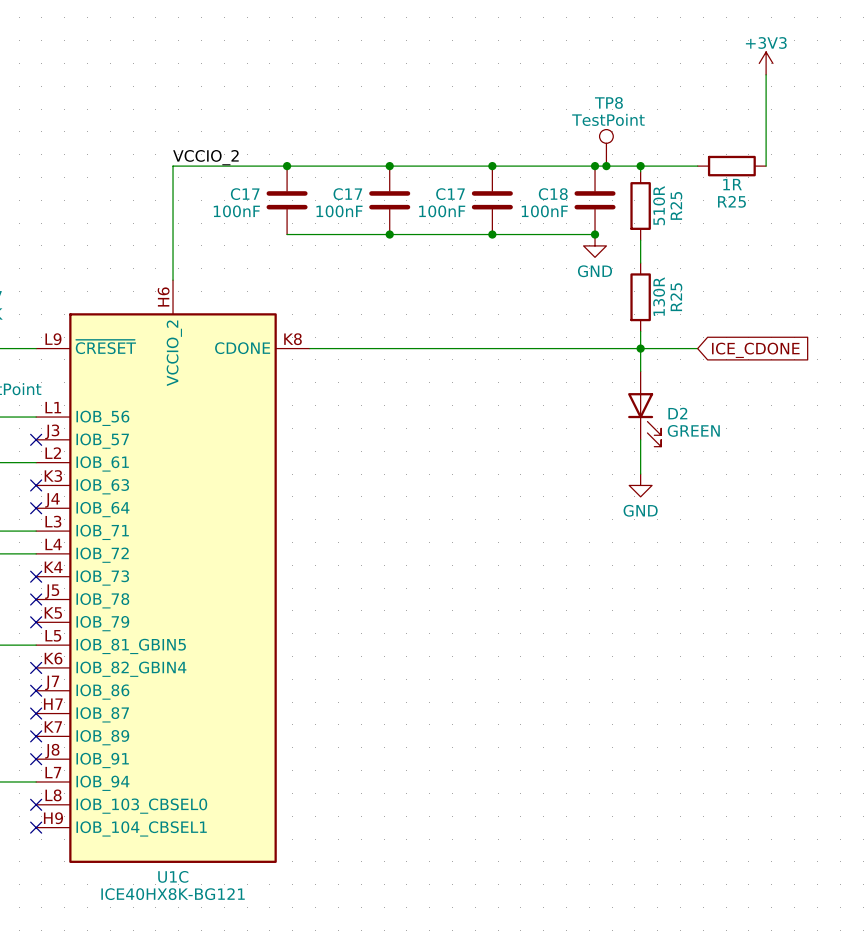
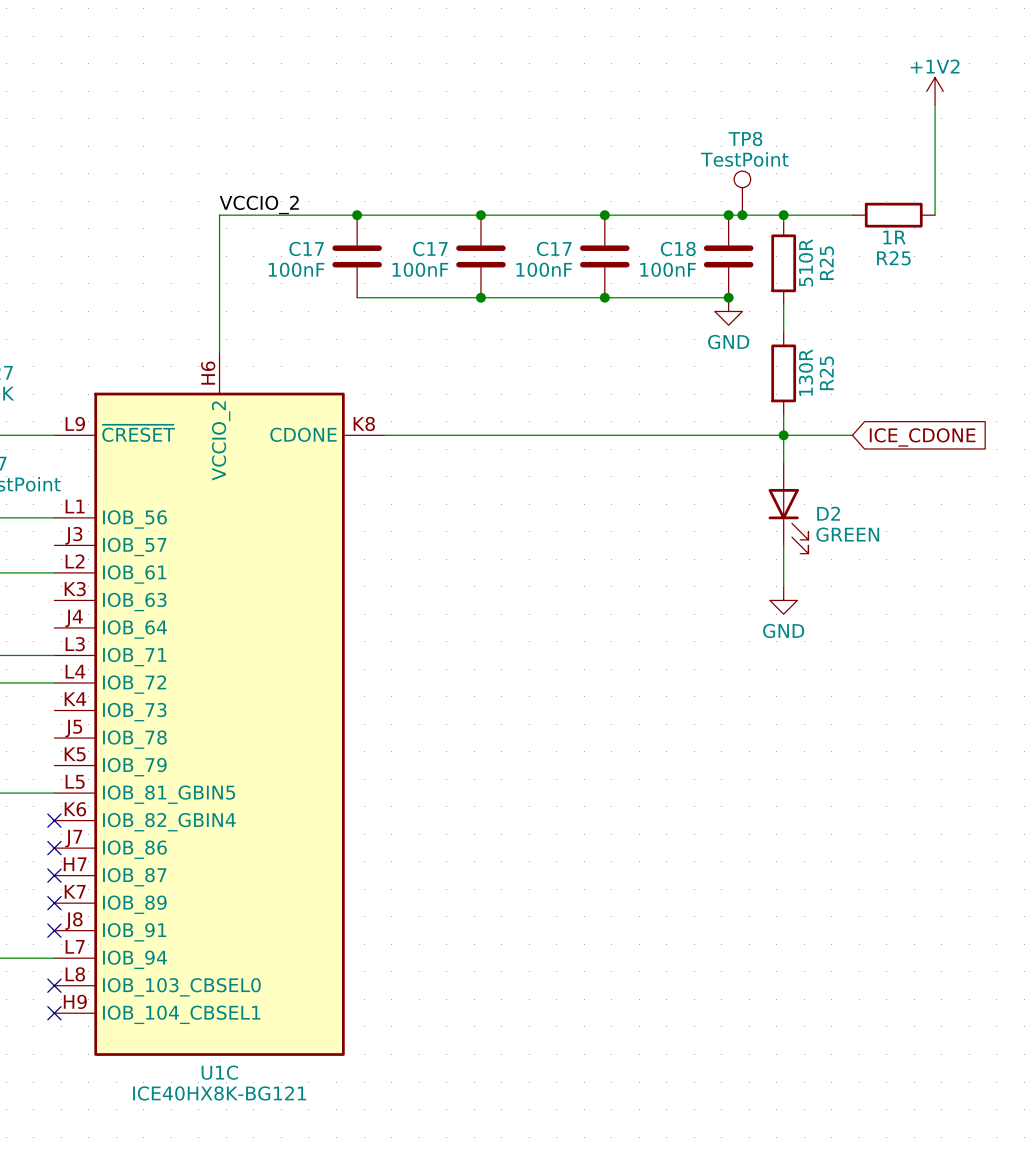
power symbol: +3V3 (766, 63) -> +1V2 (935, 91)
no-connect mark: (36, 439) -> none
no-connect mark: (36, 485) -> none
no-connect mark: (36, 508) -> none
no-connect mark: (36, 576) -> none
no-connect mark: (36, 599) -> none
no-connect mark: (36, 622) -> none

